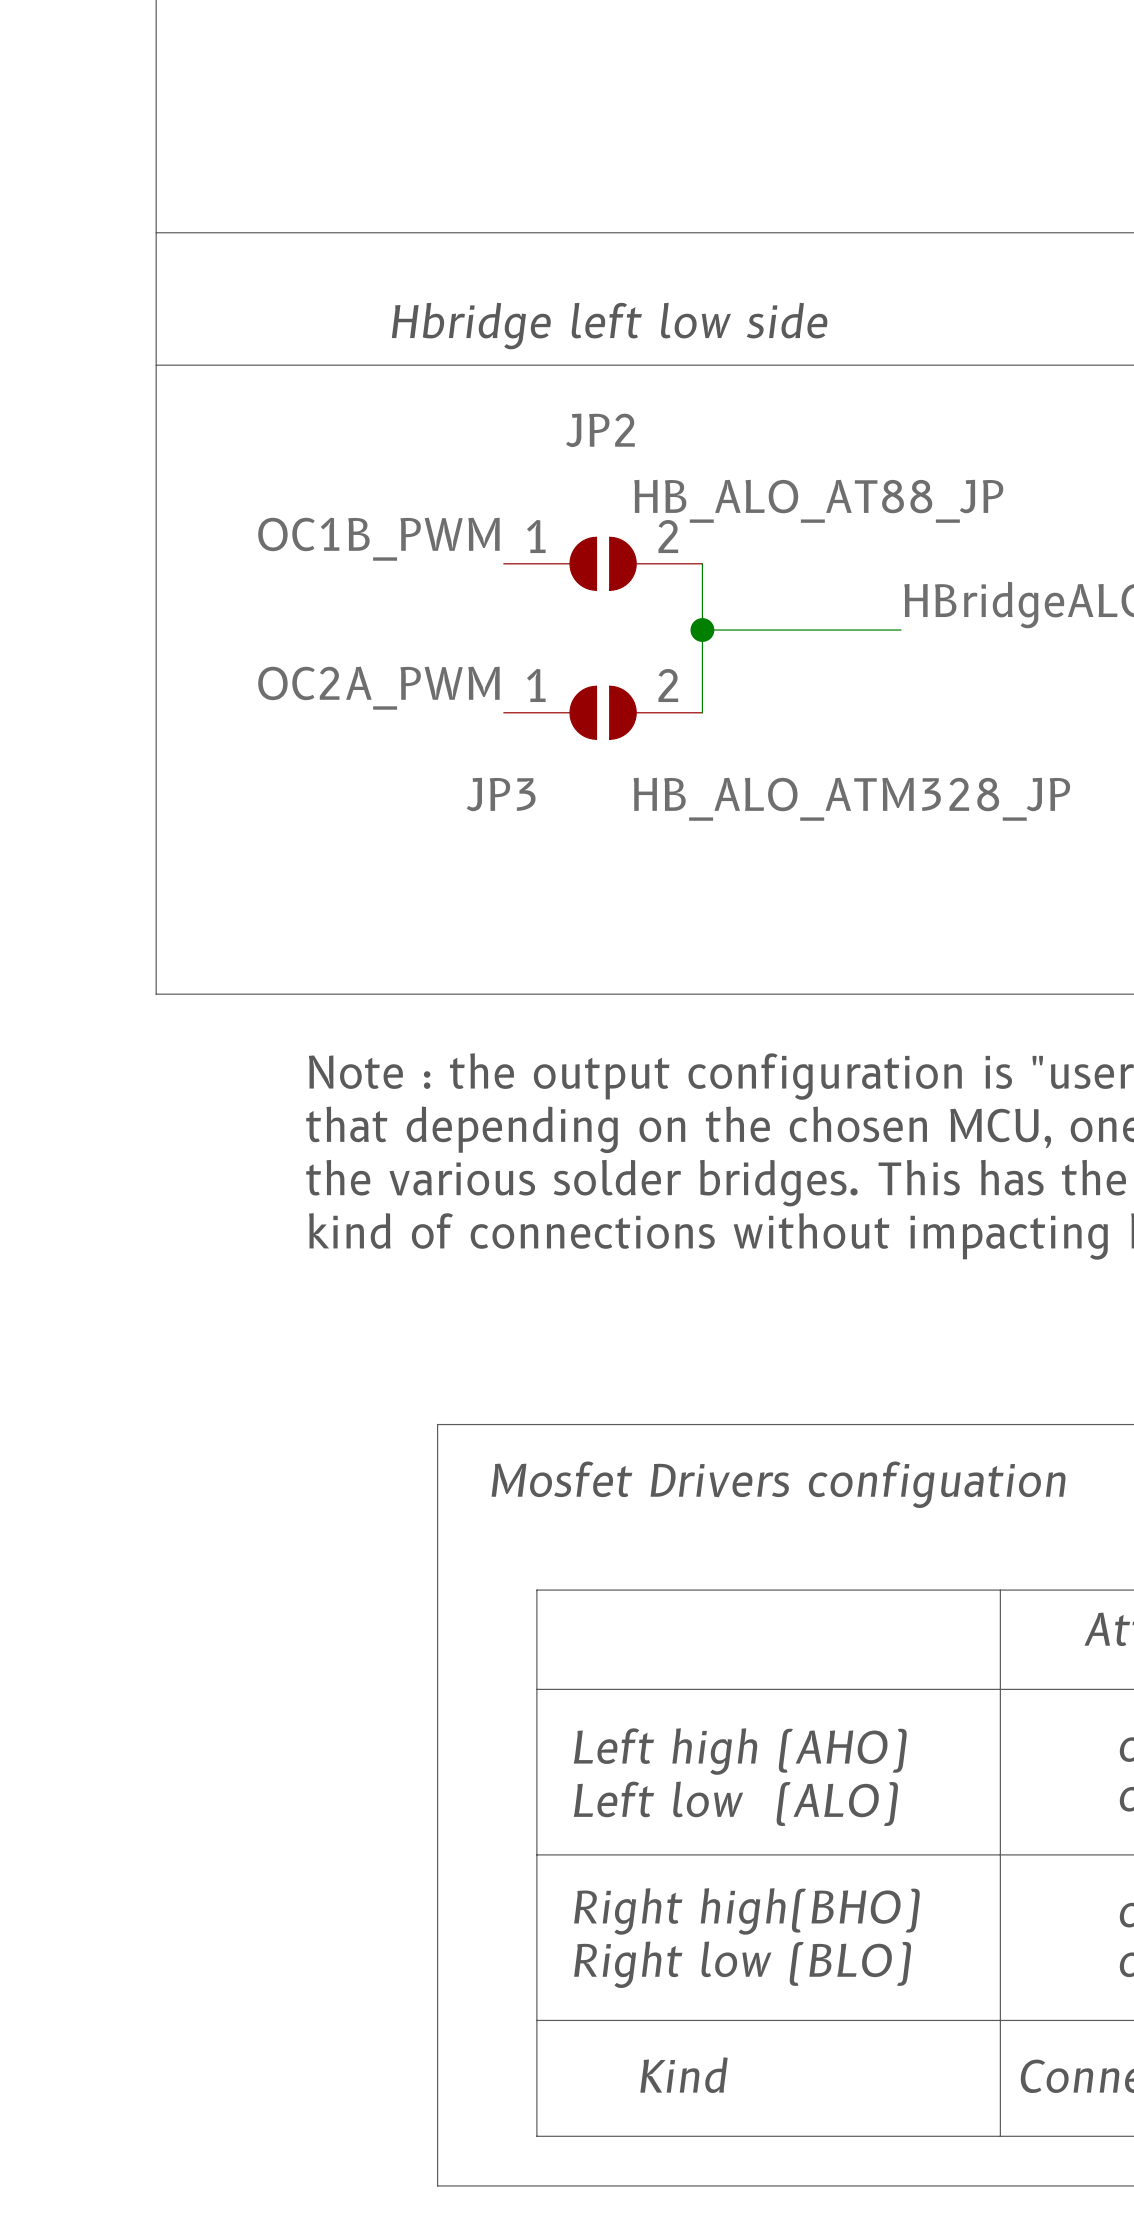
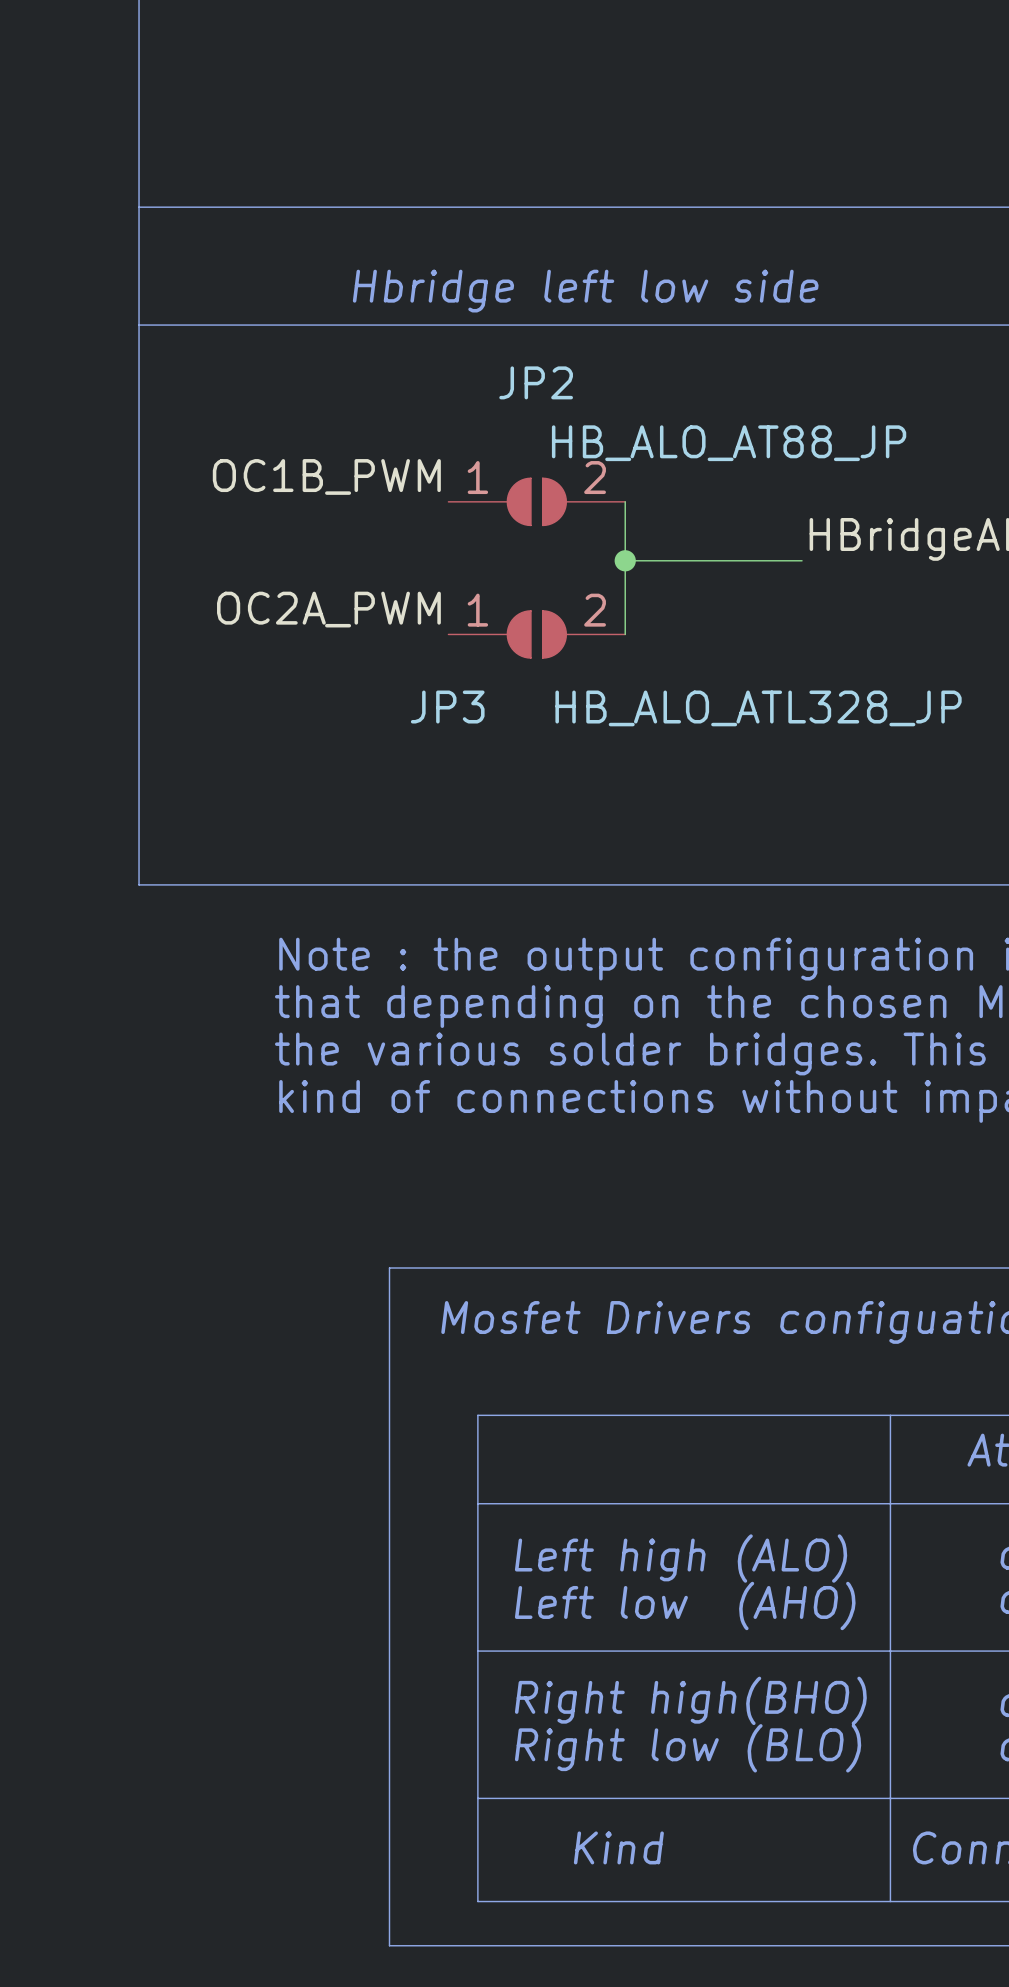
JP3 value: HB_ALO_ATM328_JP (851, 799) -> HB_ALO_ATL328_JP (758, 708)
text: Left high (AHO) (740, 1751) -> Left high (ALO) (681, 1558)
text: Left low (ALO) (735, 1803) -> Left low (AHO) (685, 1605)

